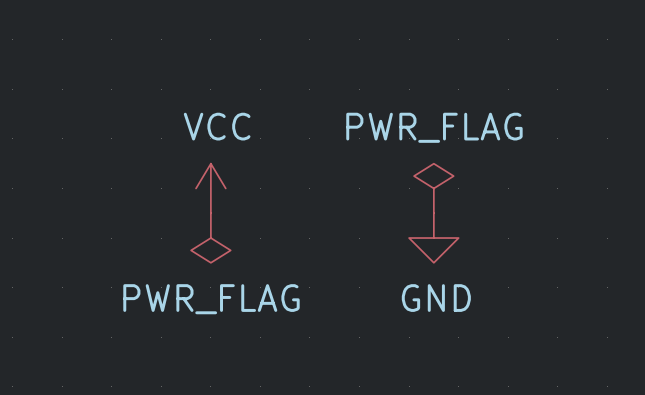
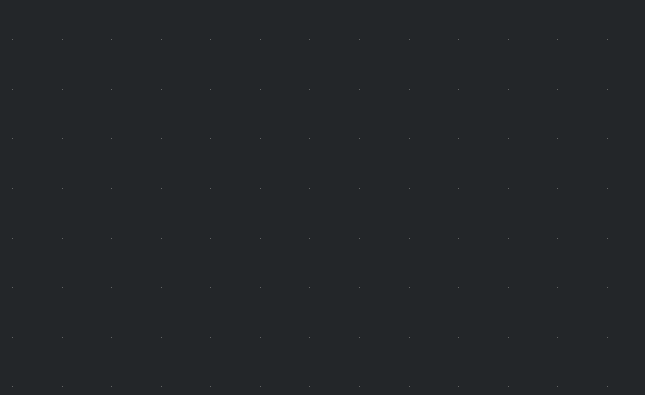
power symbol: VCC (210, 188) -> none
power symbol: PWR_FLAG (433, 188) -> none
power symbol: PWR_FLAG (210, 238) -> none
power symbol: GND (433, 238) -> none

